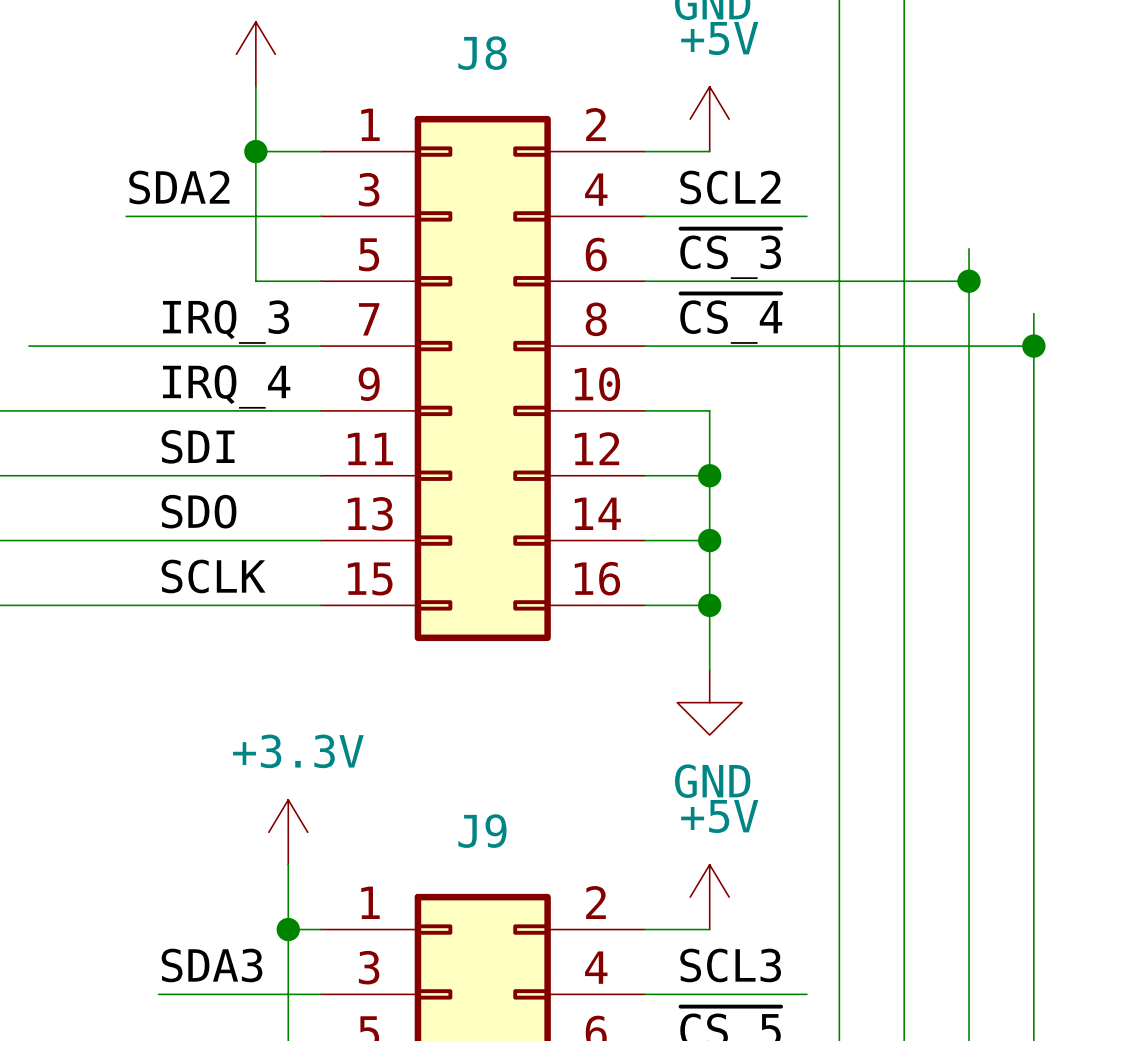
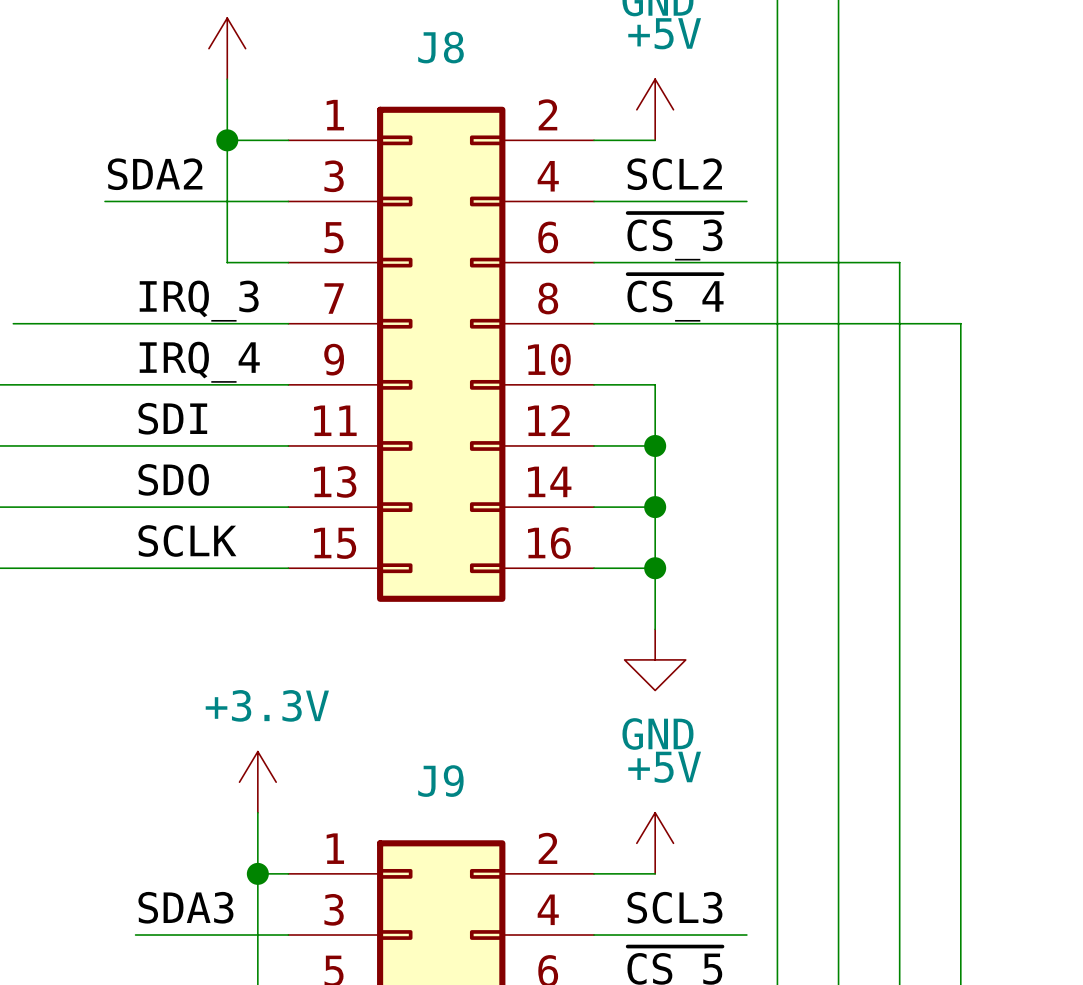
wire: (969, 248) (969, 281) -> none
junction: (969, 281) -> none
wire: (1033, 313) (1033, 346) -> none
junction: (1033, 346) -> none

